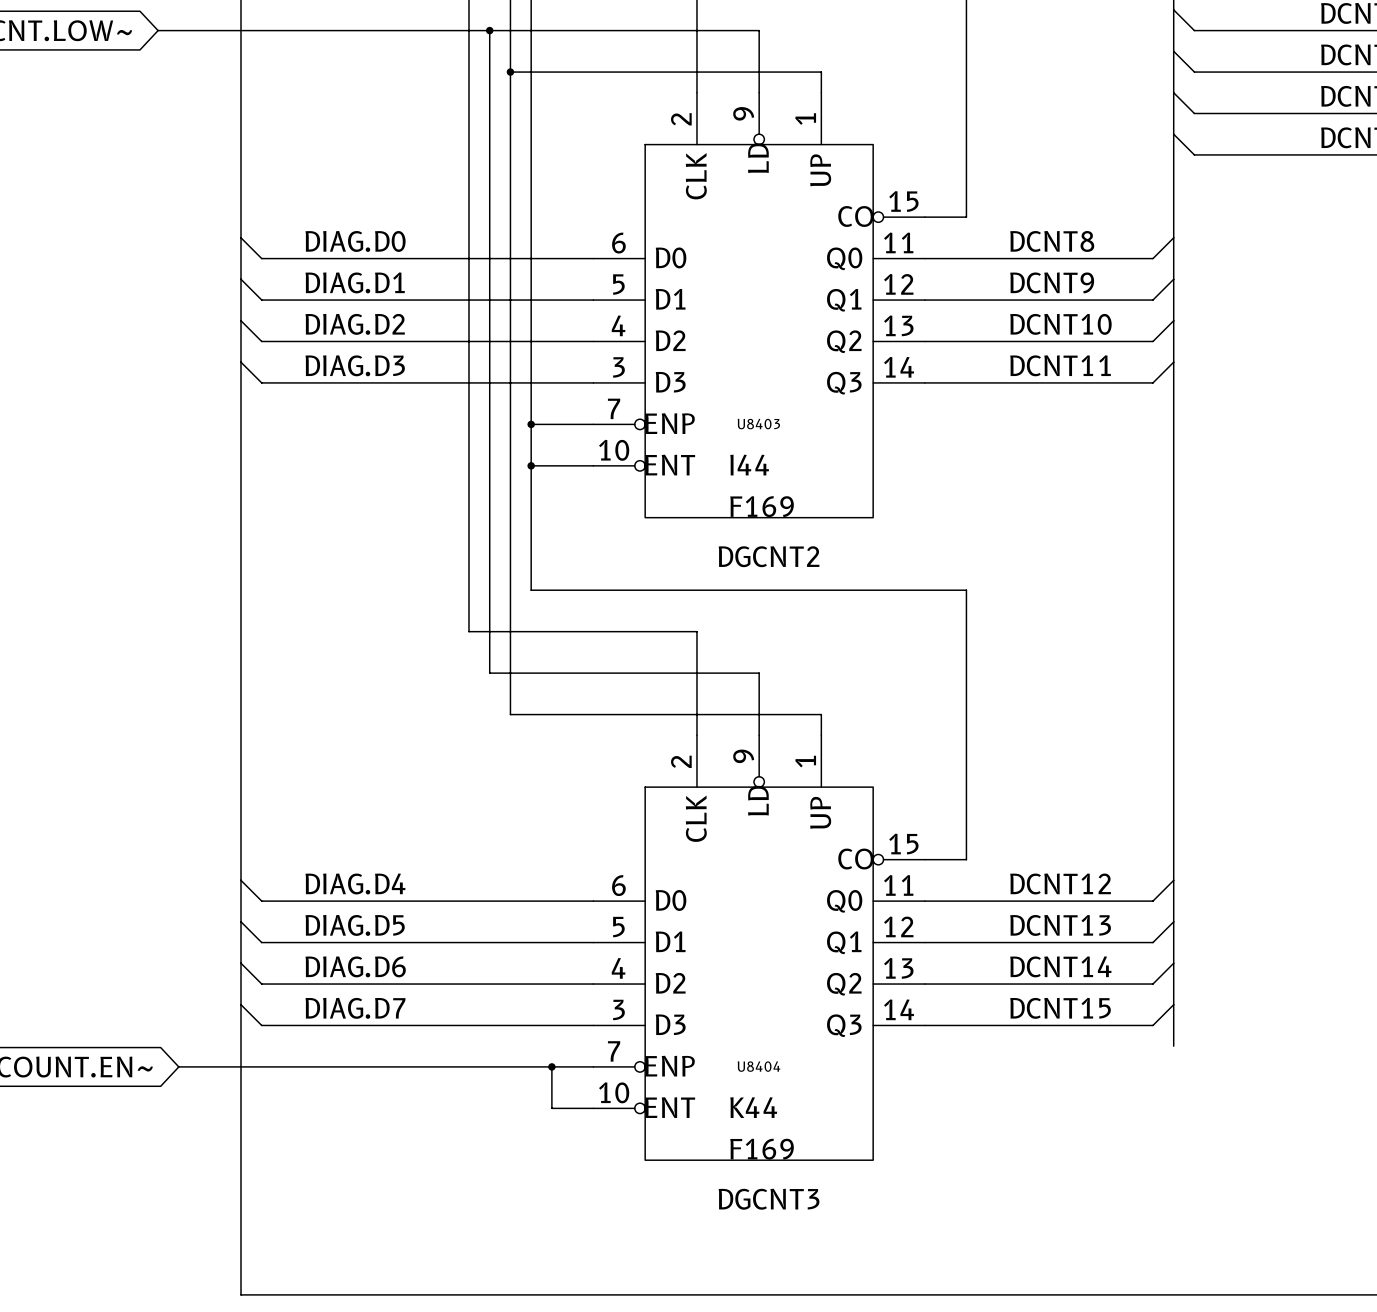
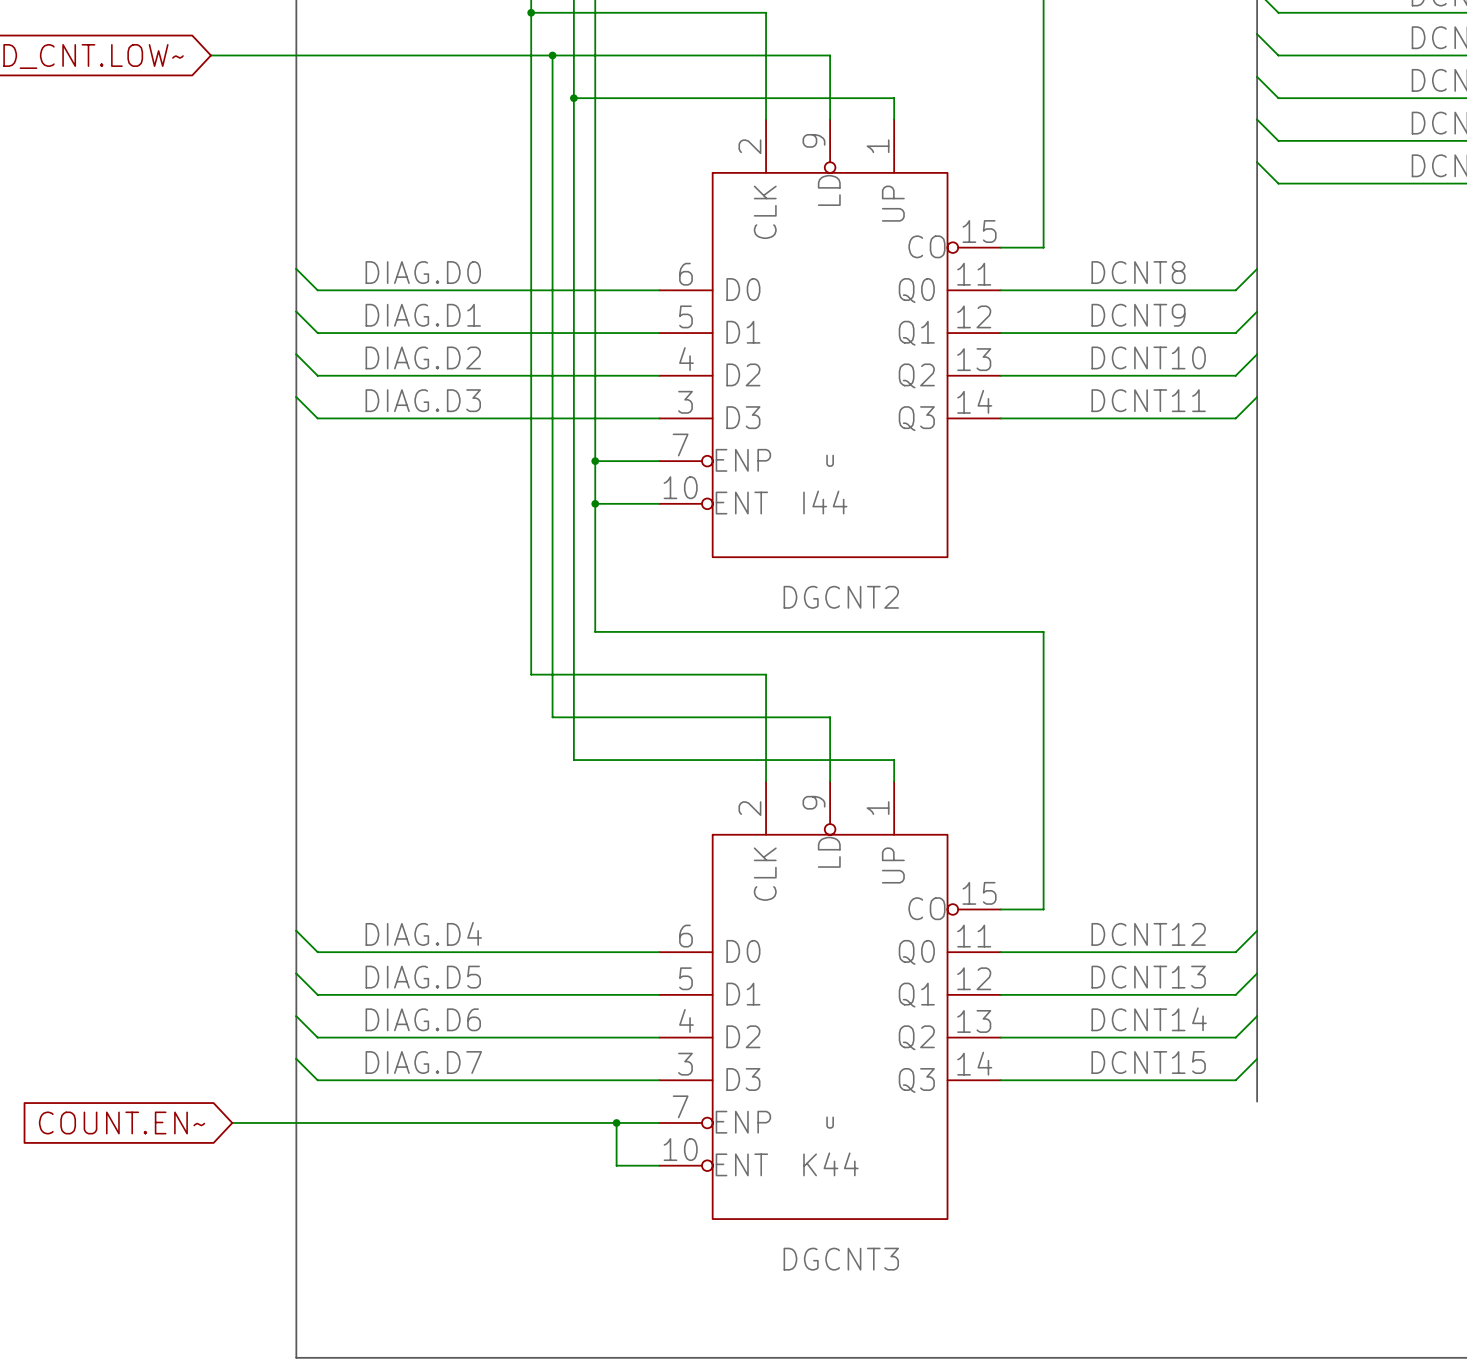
U8403 name: U8403 (758, 424) -> U (830, 460)
U8403 value: F169 (762, 506) -> none
U8404 name: U8404 (759, 1066) -> U (830, 1122)
U8404 value: F169 (762, 1149) -> none

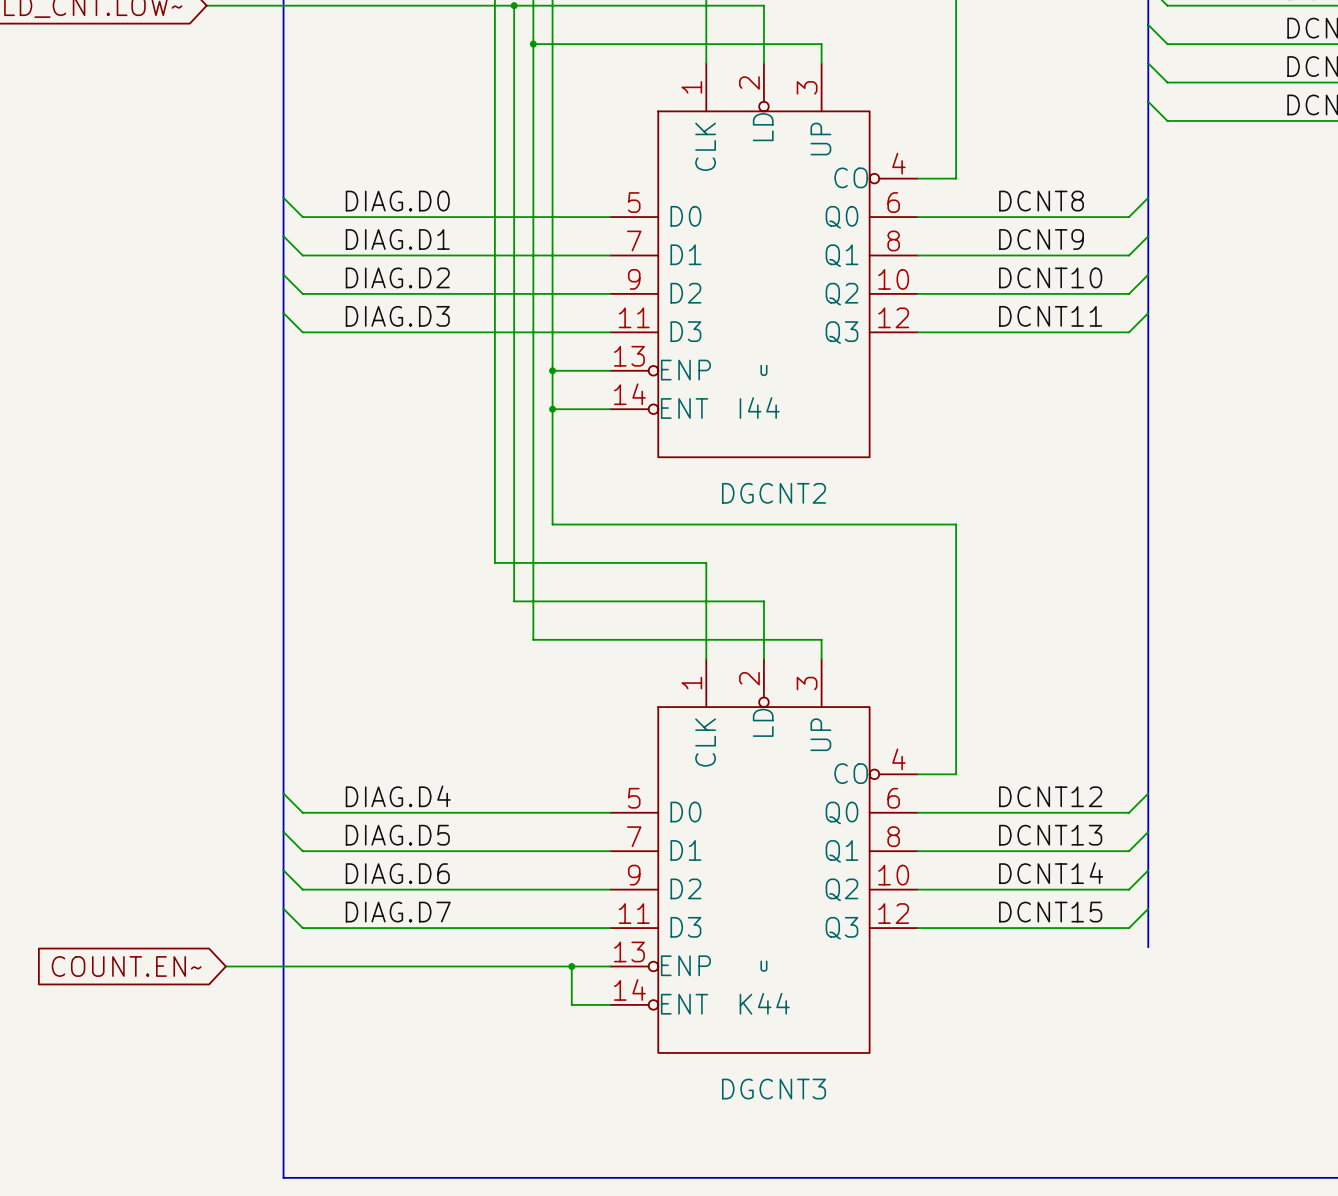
U symbol: [659, 119, 1001, 558] -> [610, 63, 918, 458]
U symbol: [659, 781, 1001, 1220] -> [610, 659, 918, 1053]

